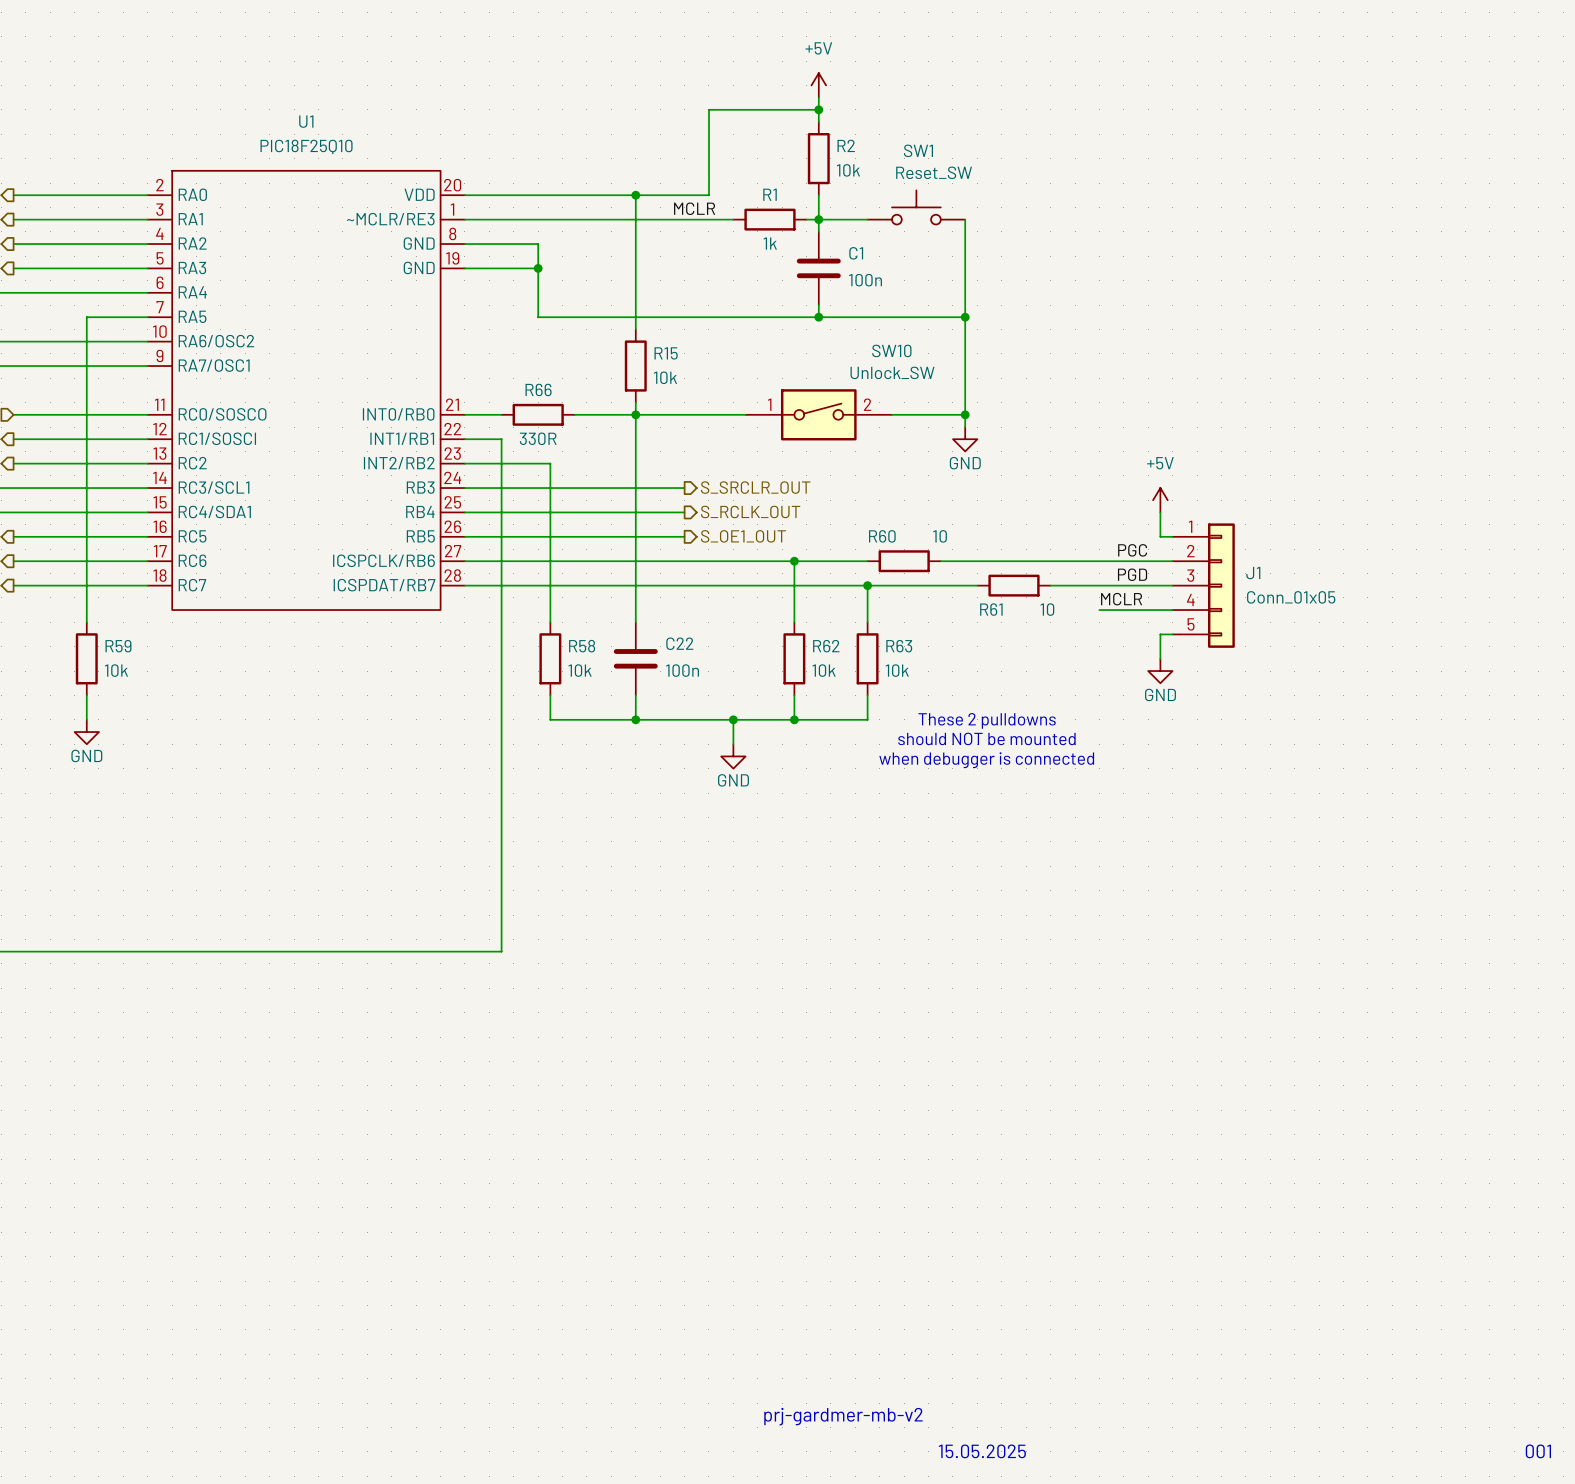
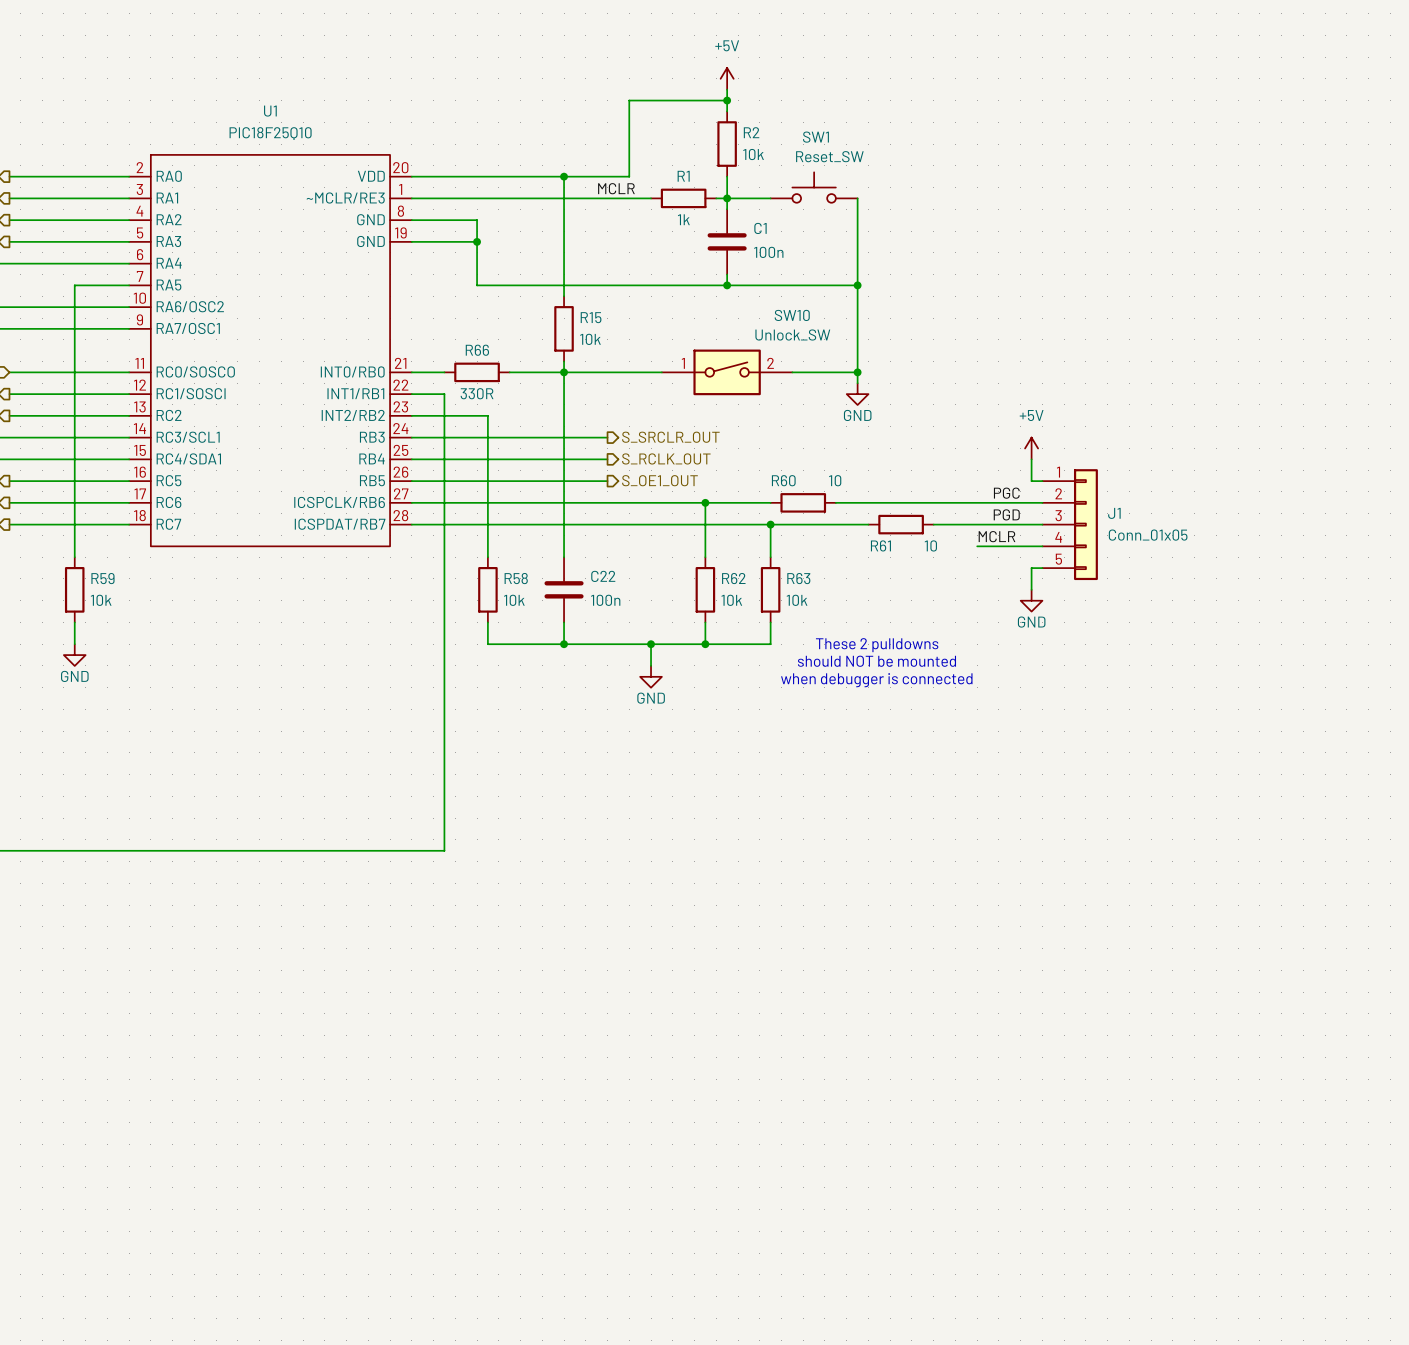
text: prj-gardmer-mb-v2 (843, 1416) -> none
text: 15.05.2025 (982, 1451) -> none
text: 001 (1538, 1451) -> none

